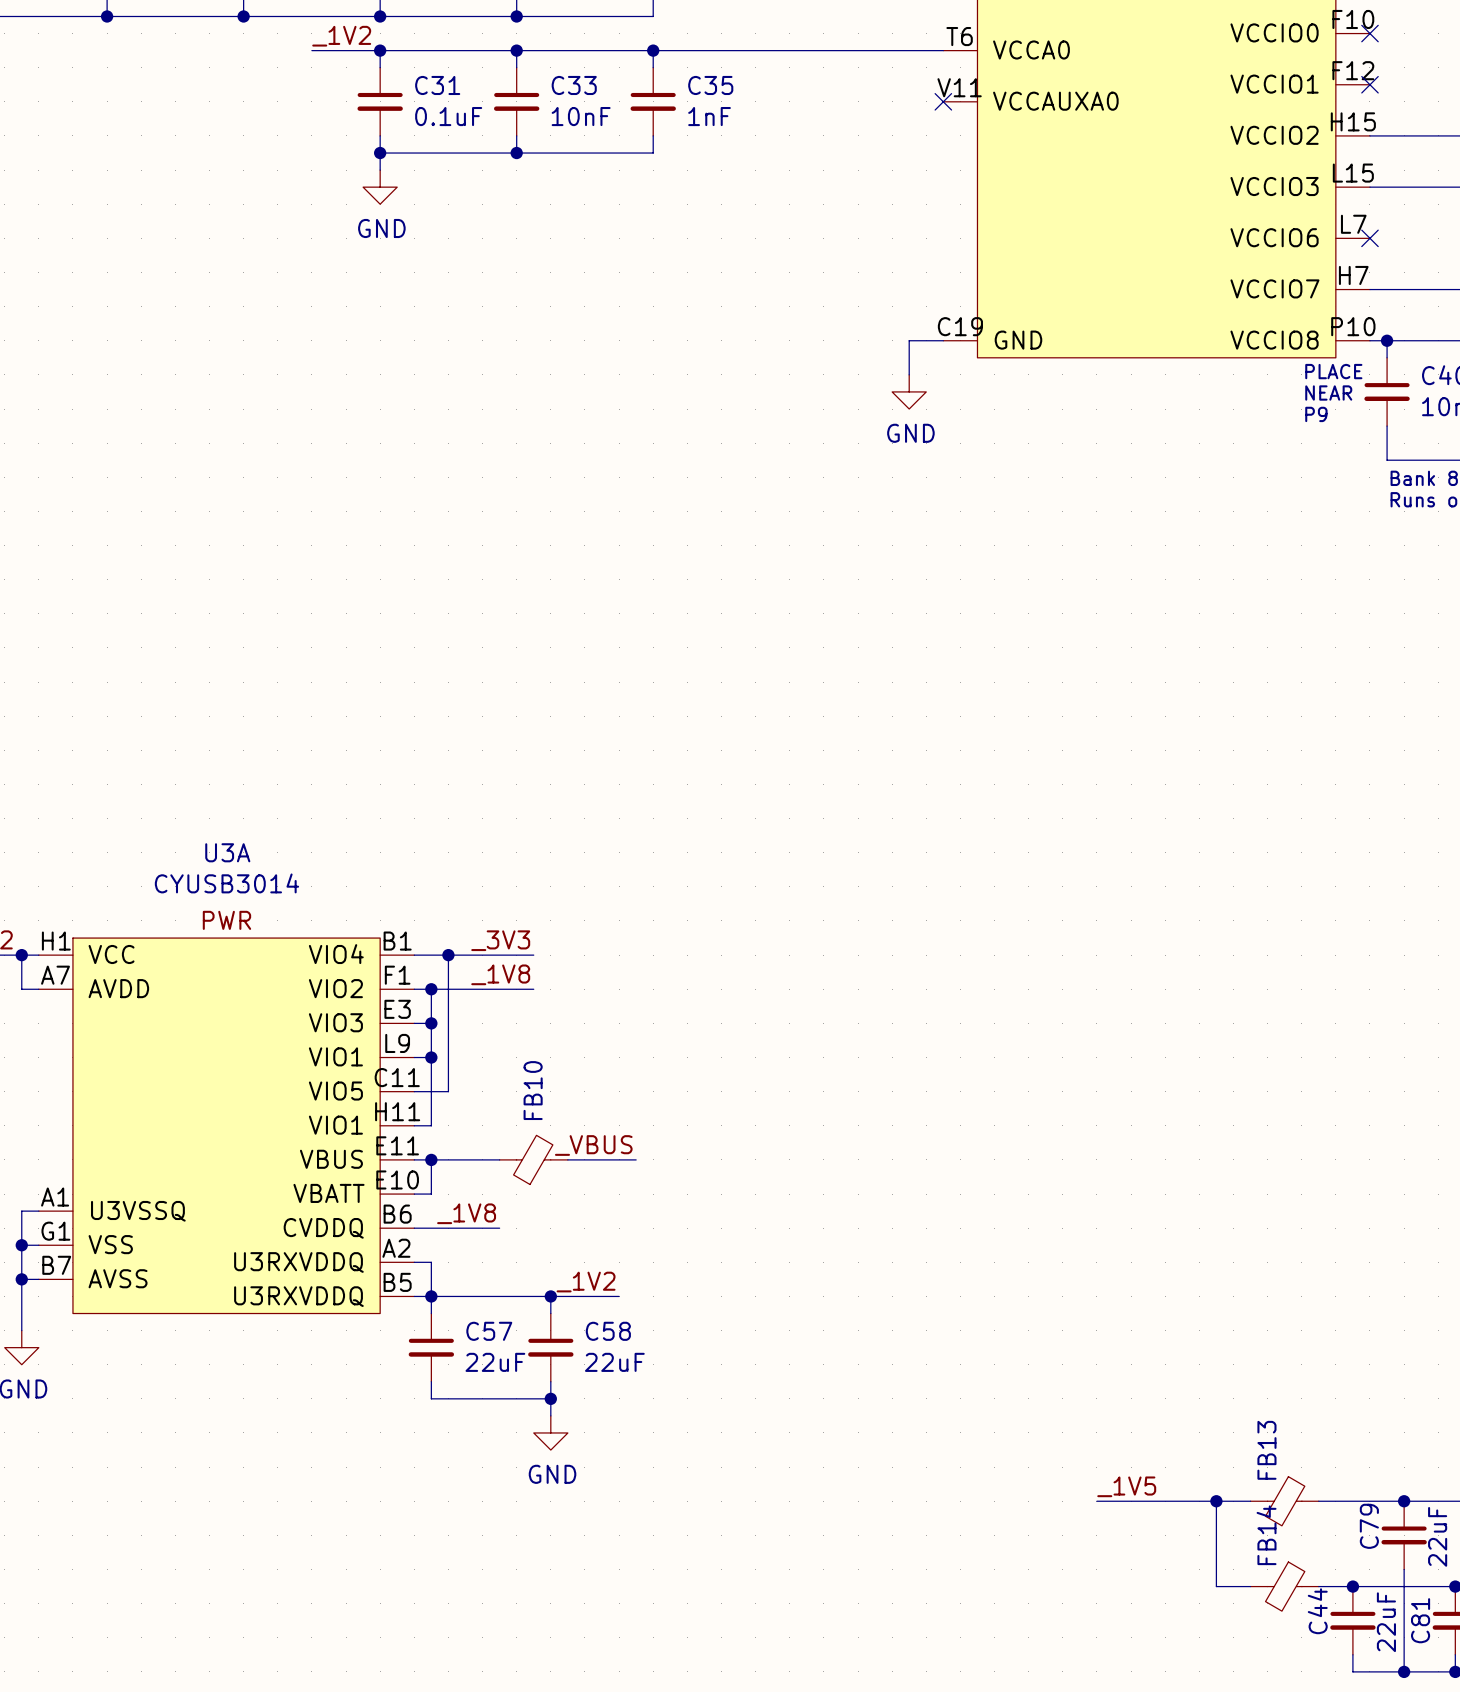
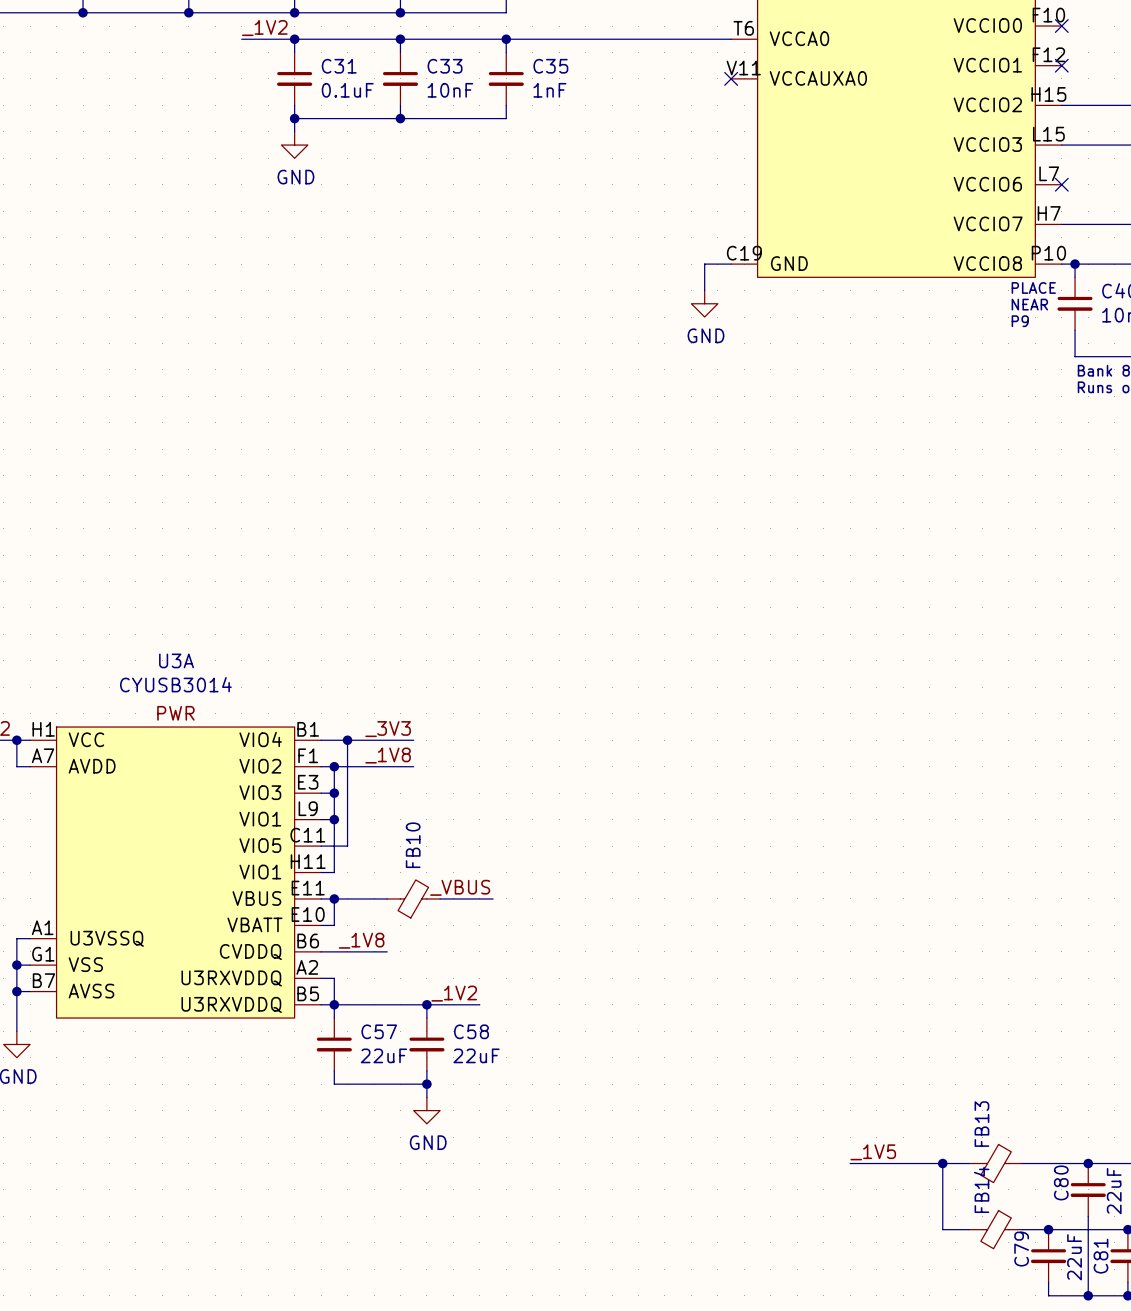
C79 name: C79 (1369, 1526) -> C80 (1061, 1182)
C44 name: C44 (1317, 1611) -> C79 (1021, 1249)

